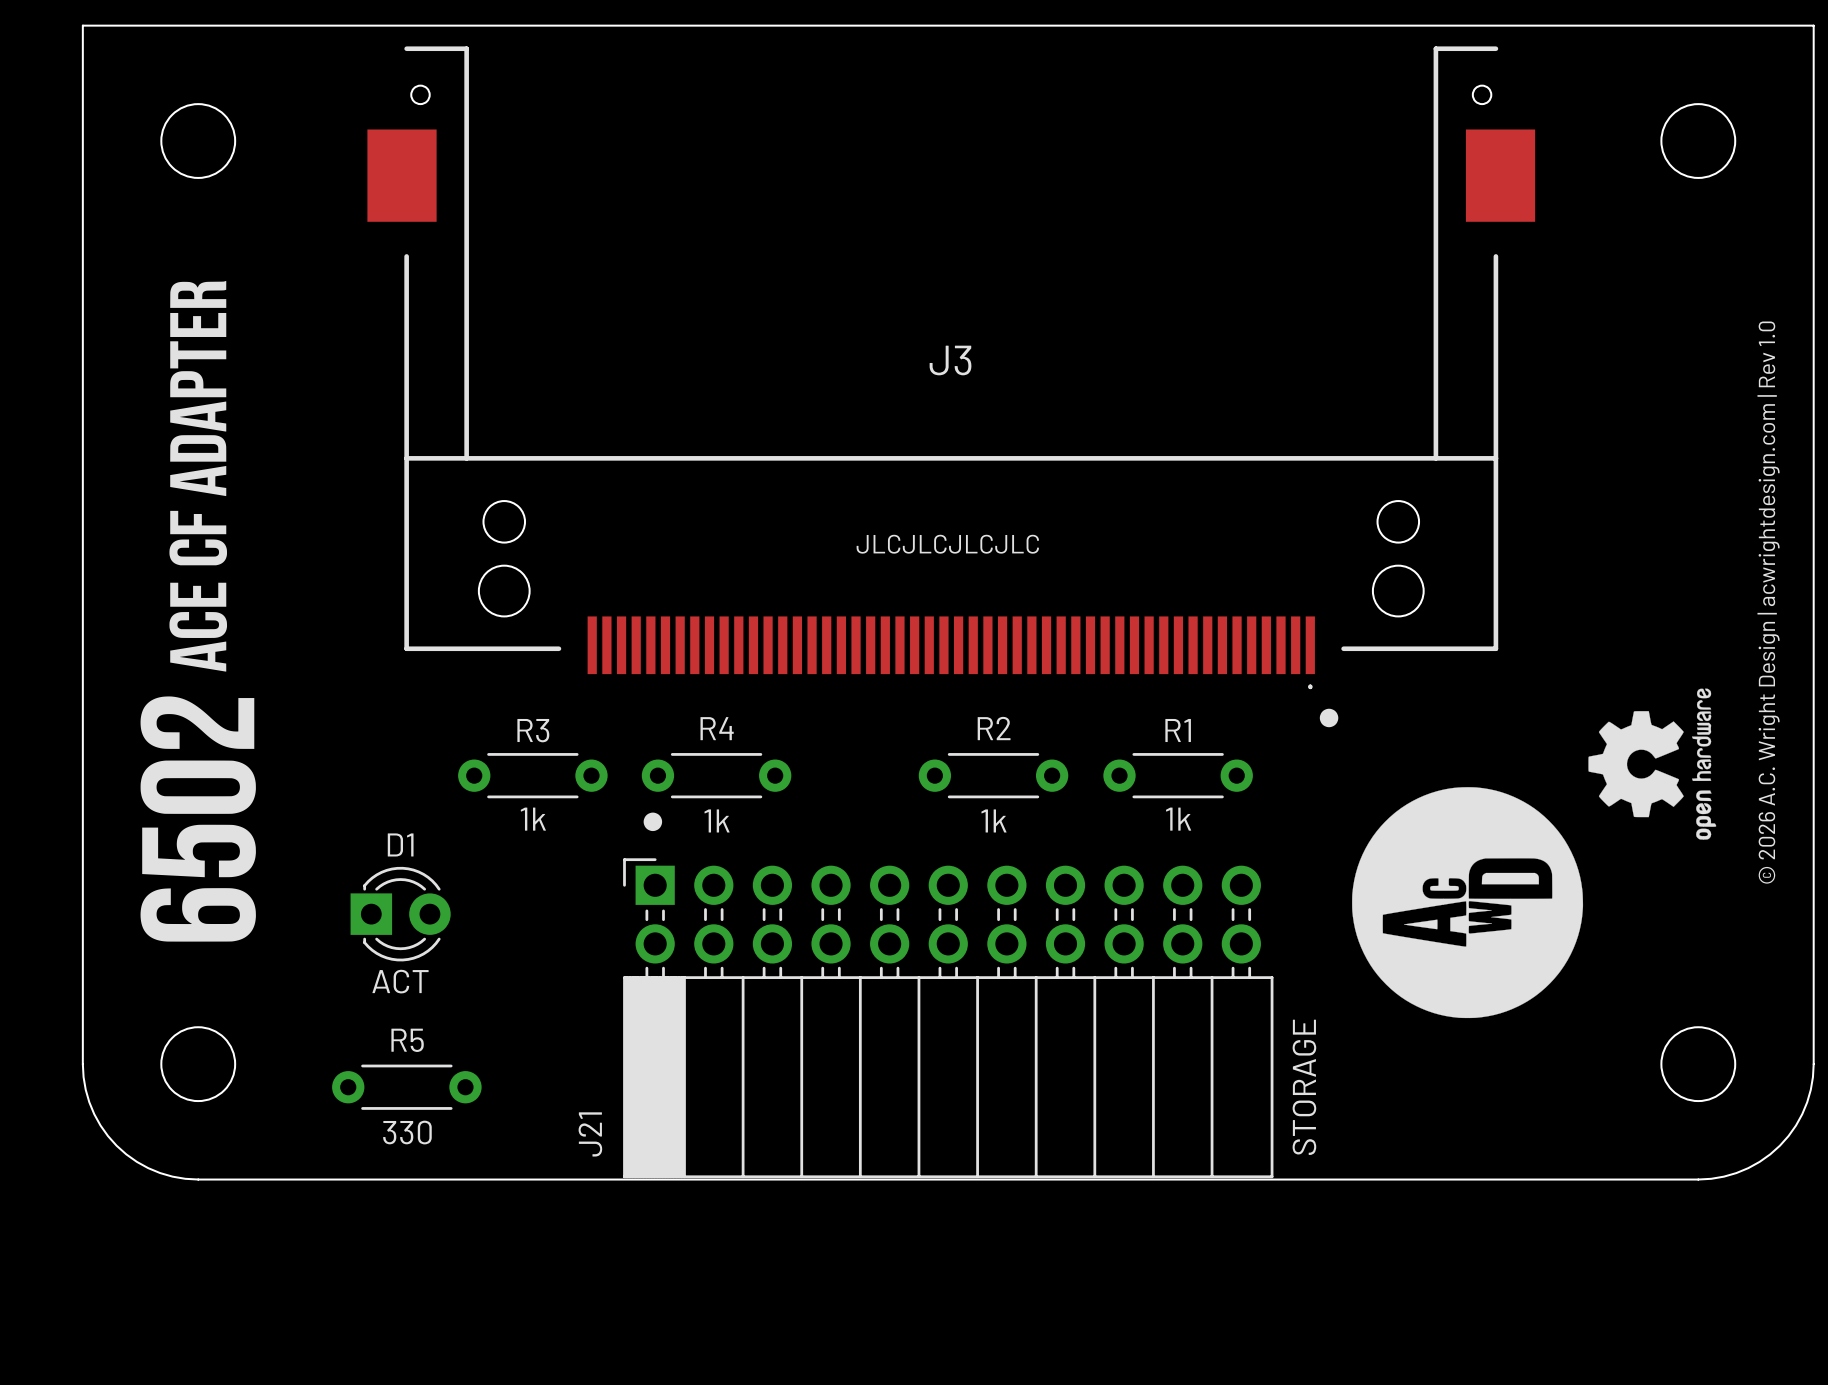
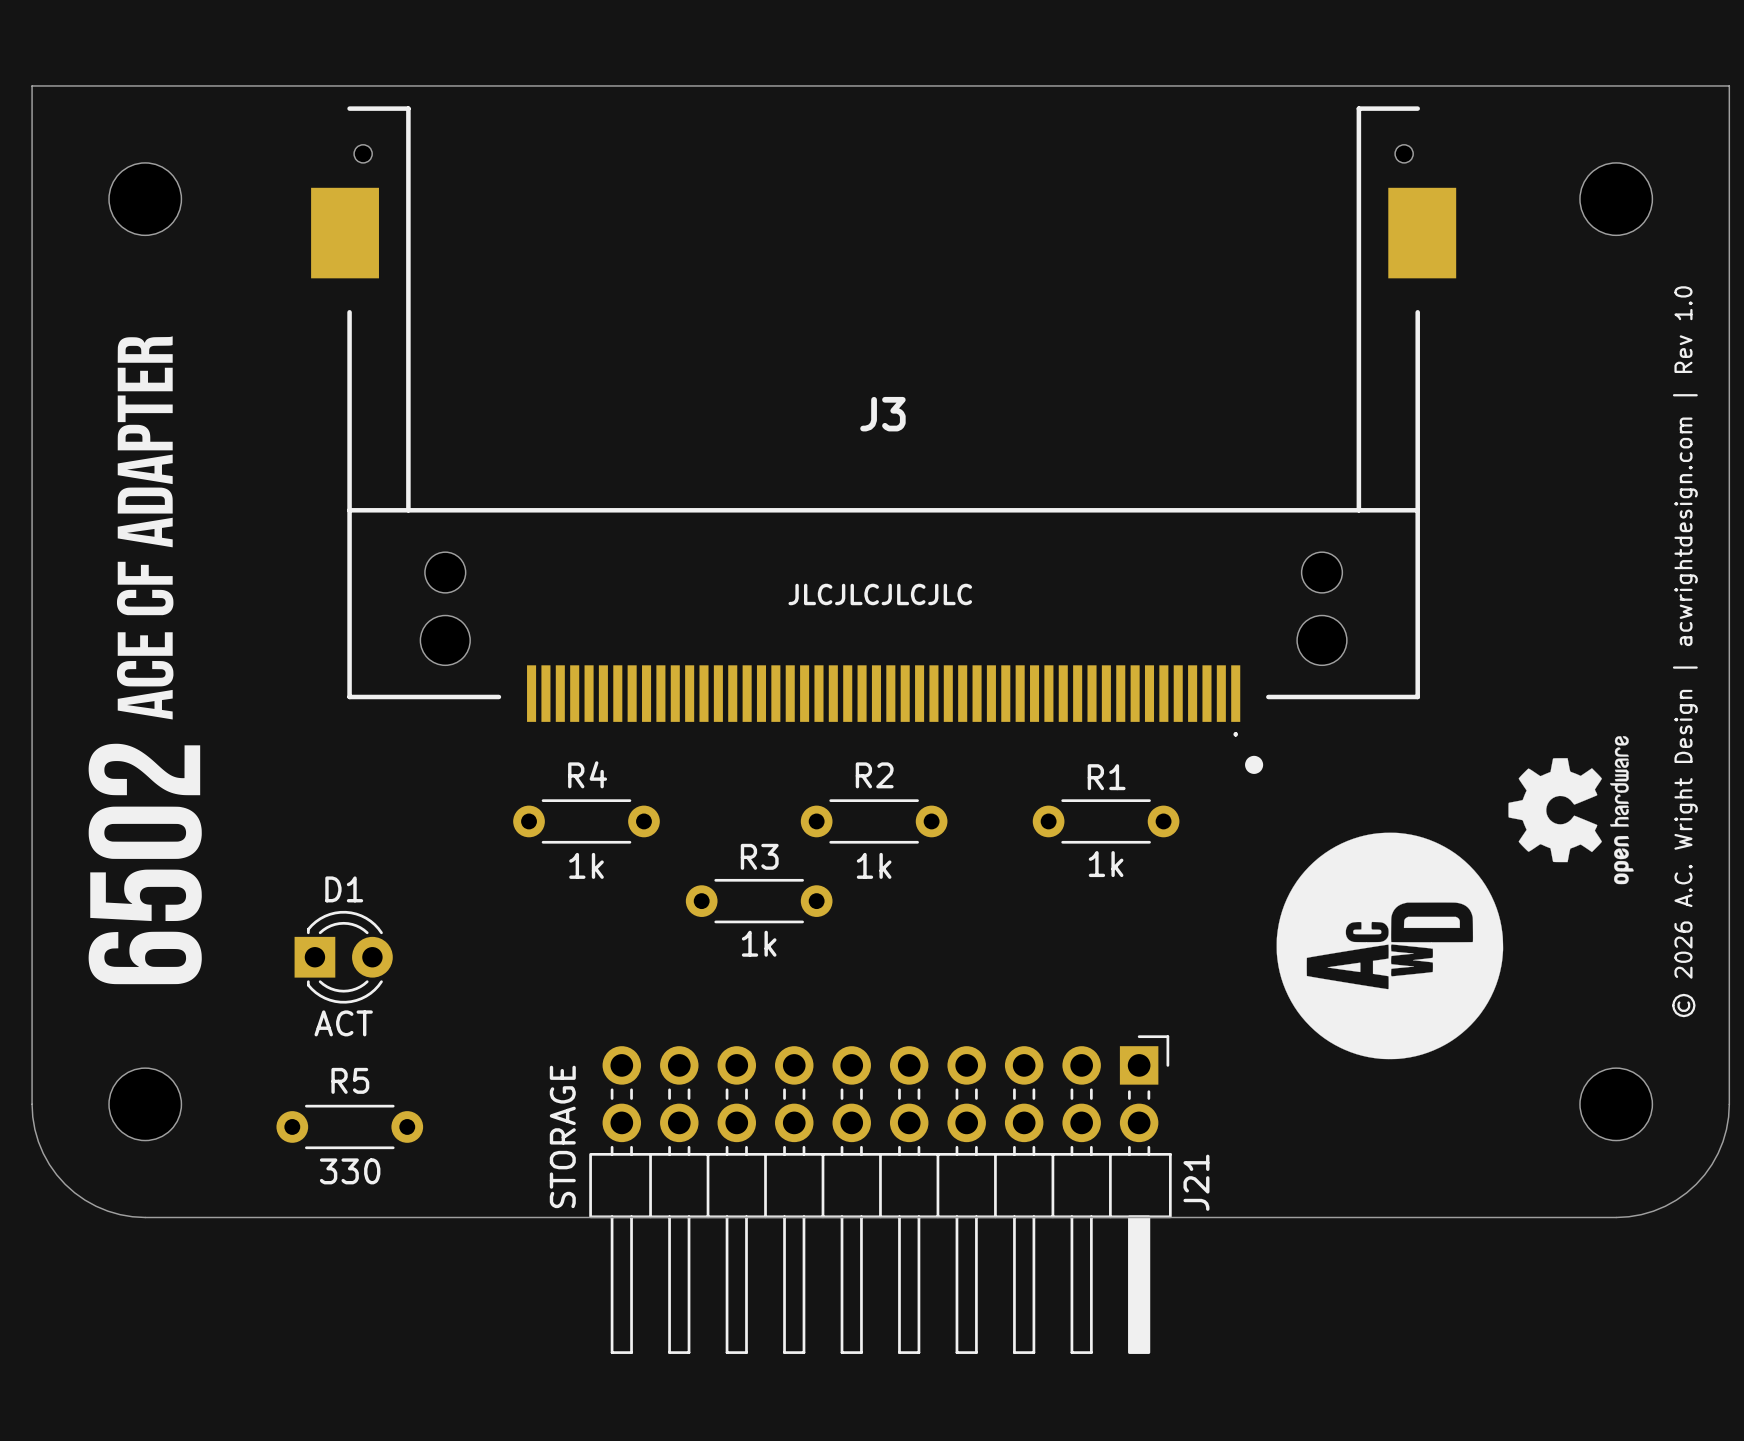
R3 position: (532, 775) -> (759, 901)
R4 position: (716, 775) -> (586, 821)
R2 position: (993, 775) -> (874, 821)
drawing: [643, 812, 663, 832] -> none
J21 footprint: [623, 858, 1274, 1179] -> [589, 1035, 1172, 1354]
J21 value position: STORAGE (1304, 1087) -> STORAGE (562, 1136)
J21 name position: J21 (590, 1134) -> J21 (1196, 1182)

